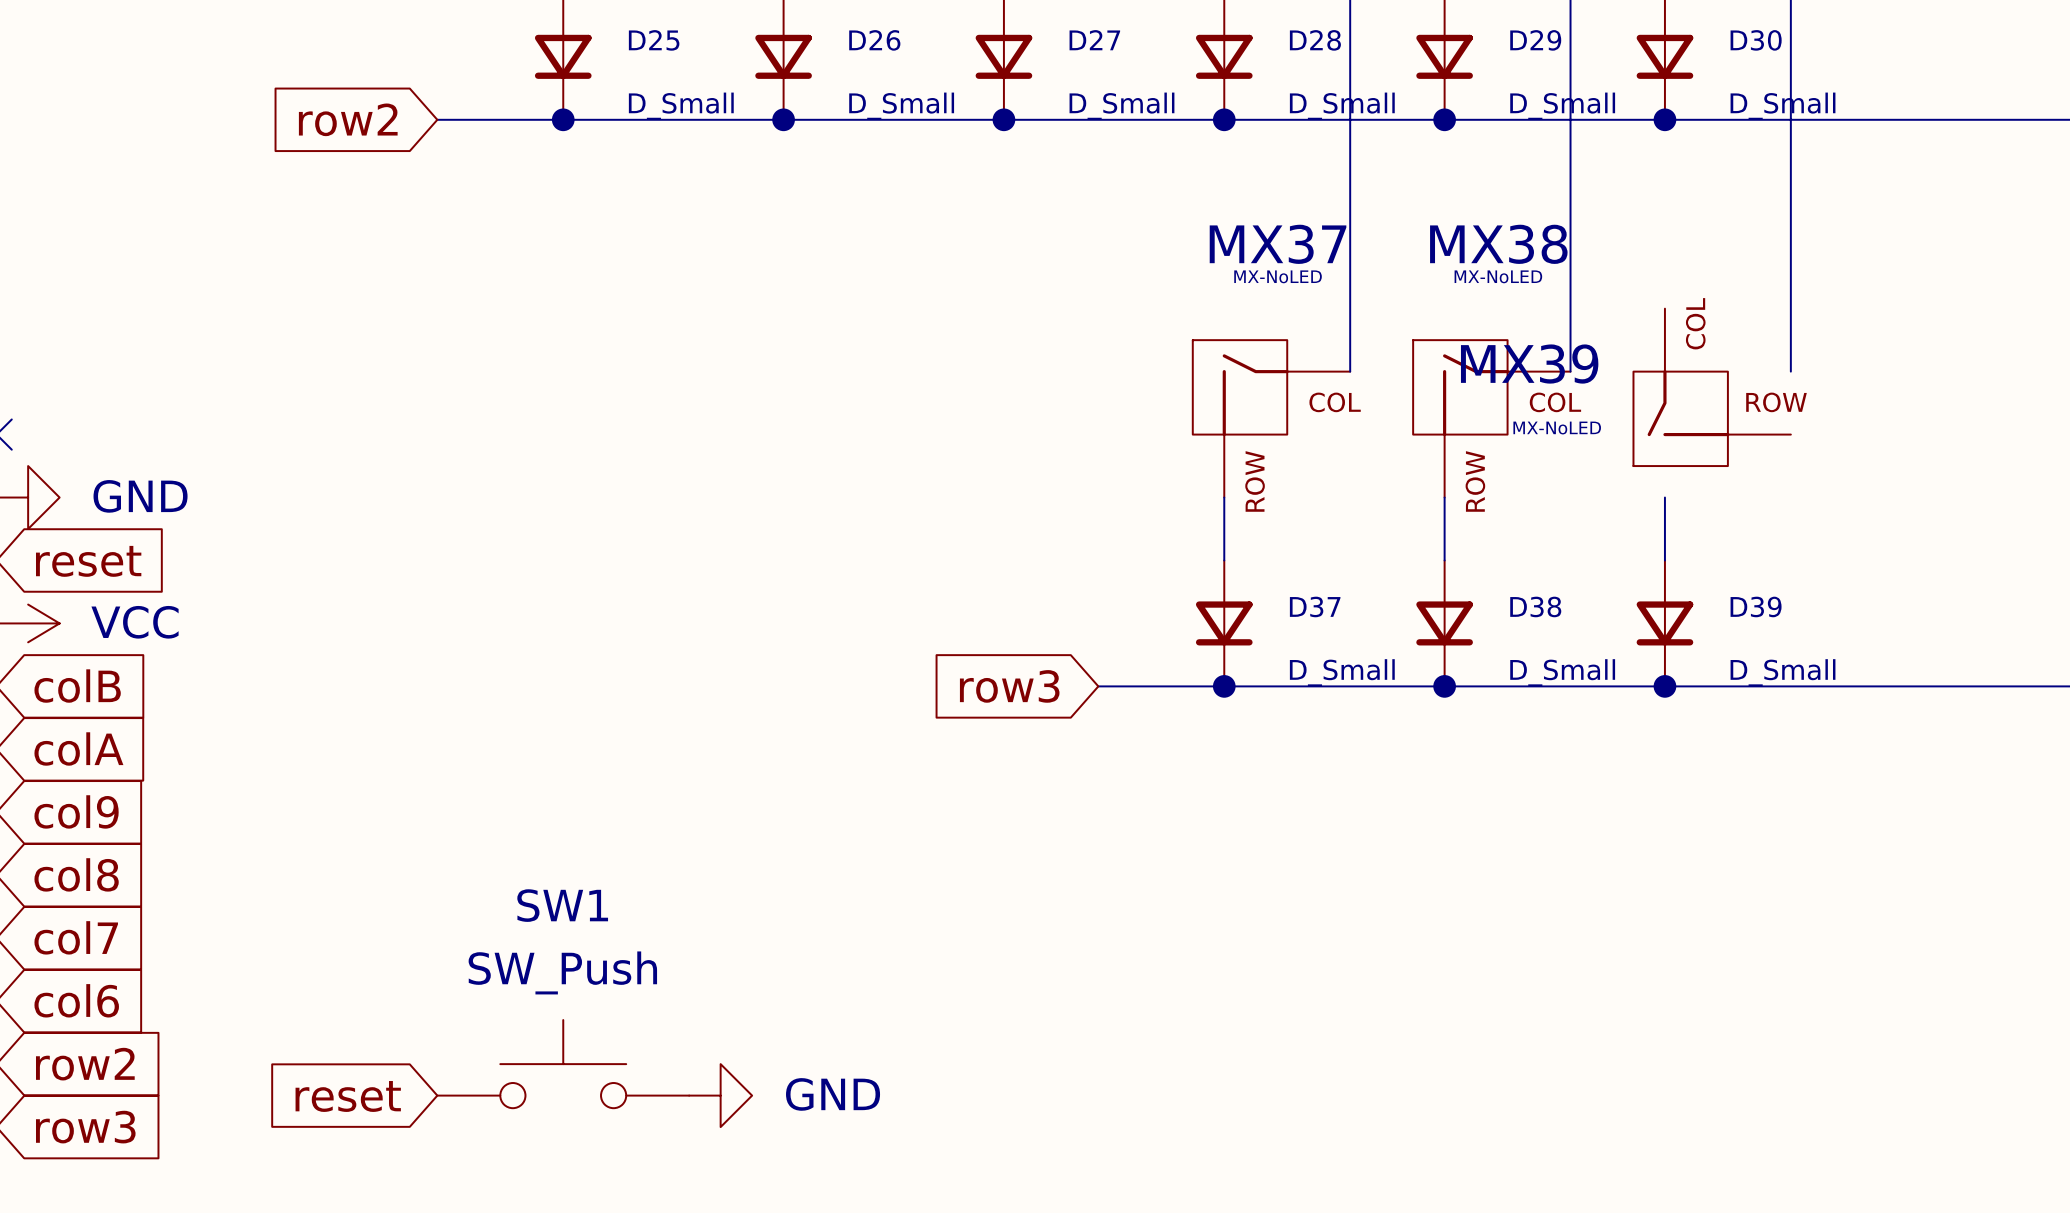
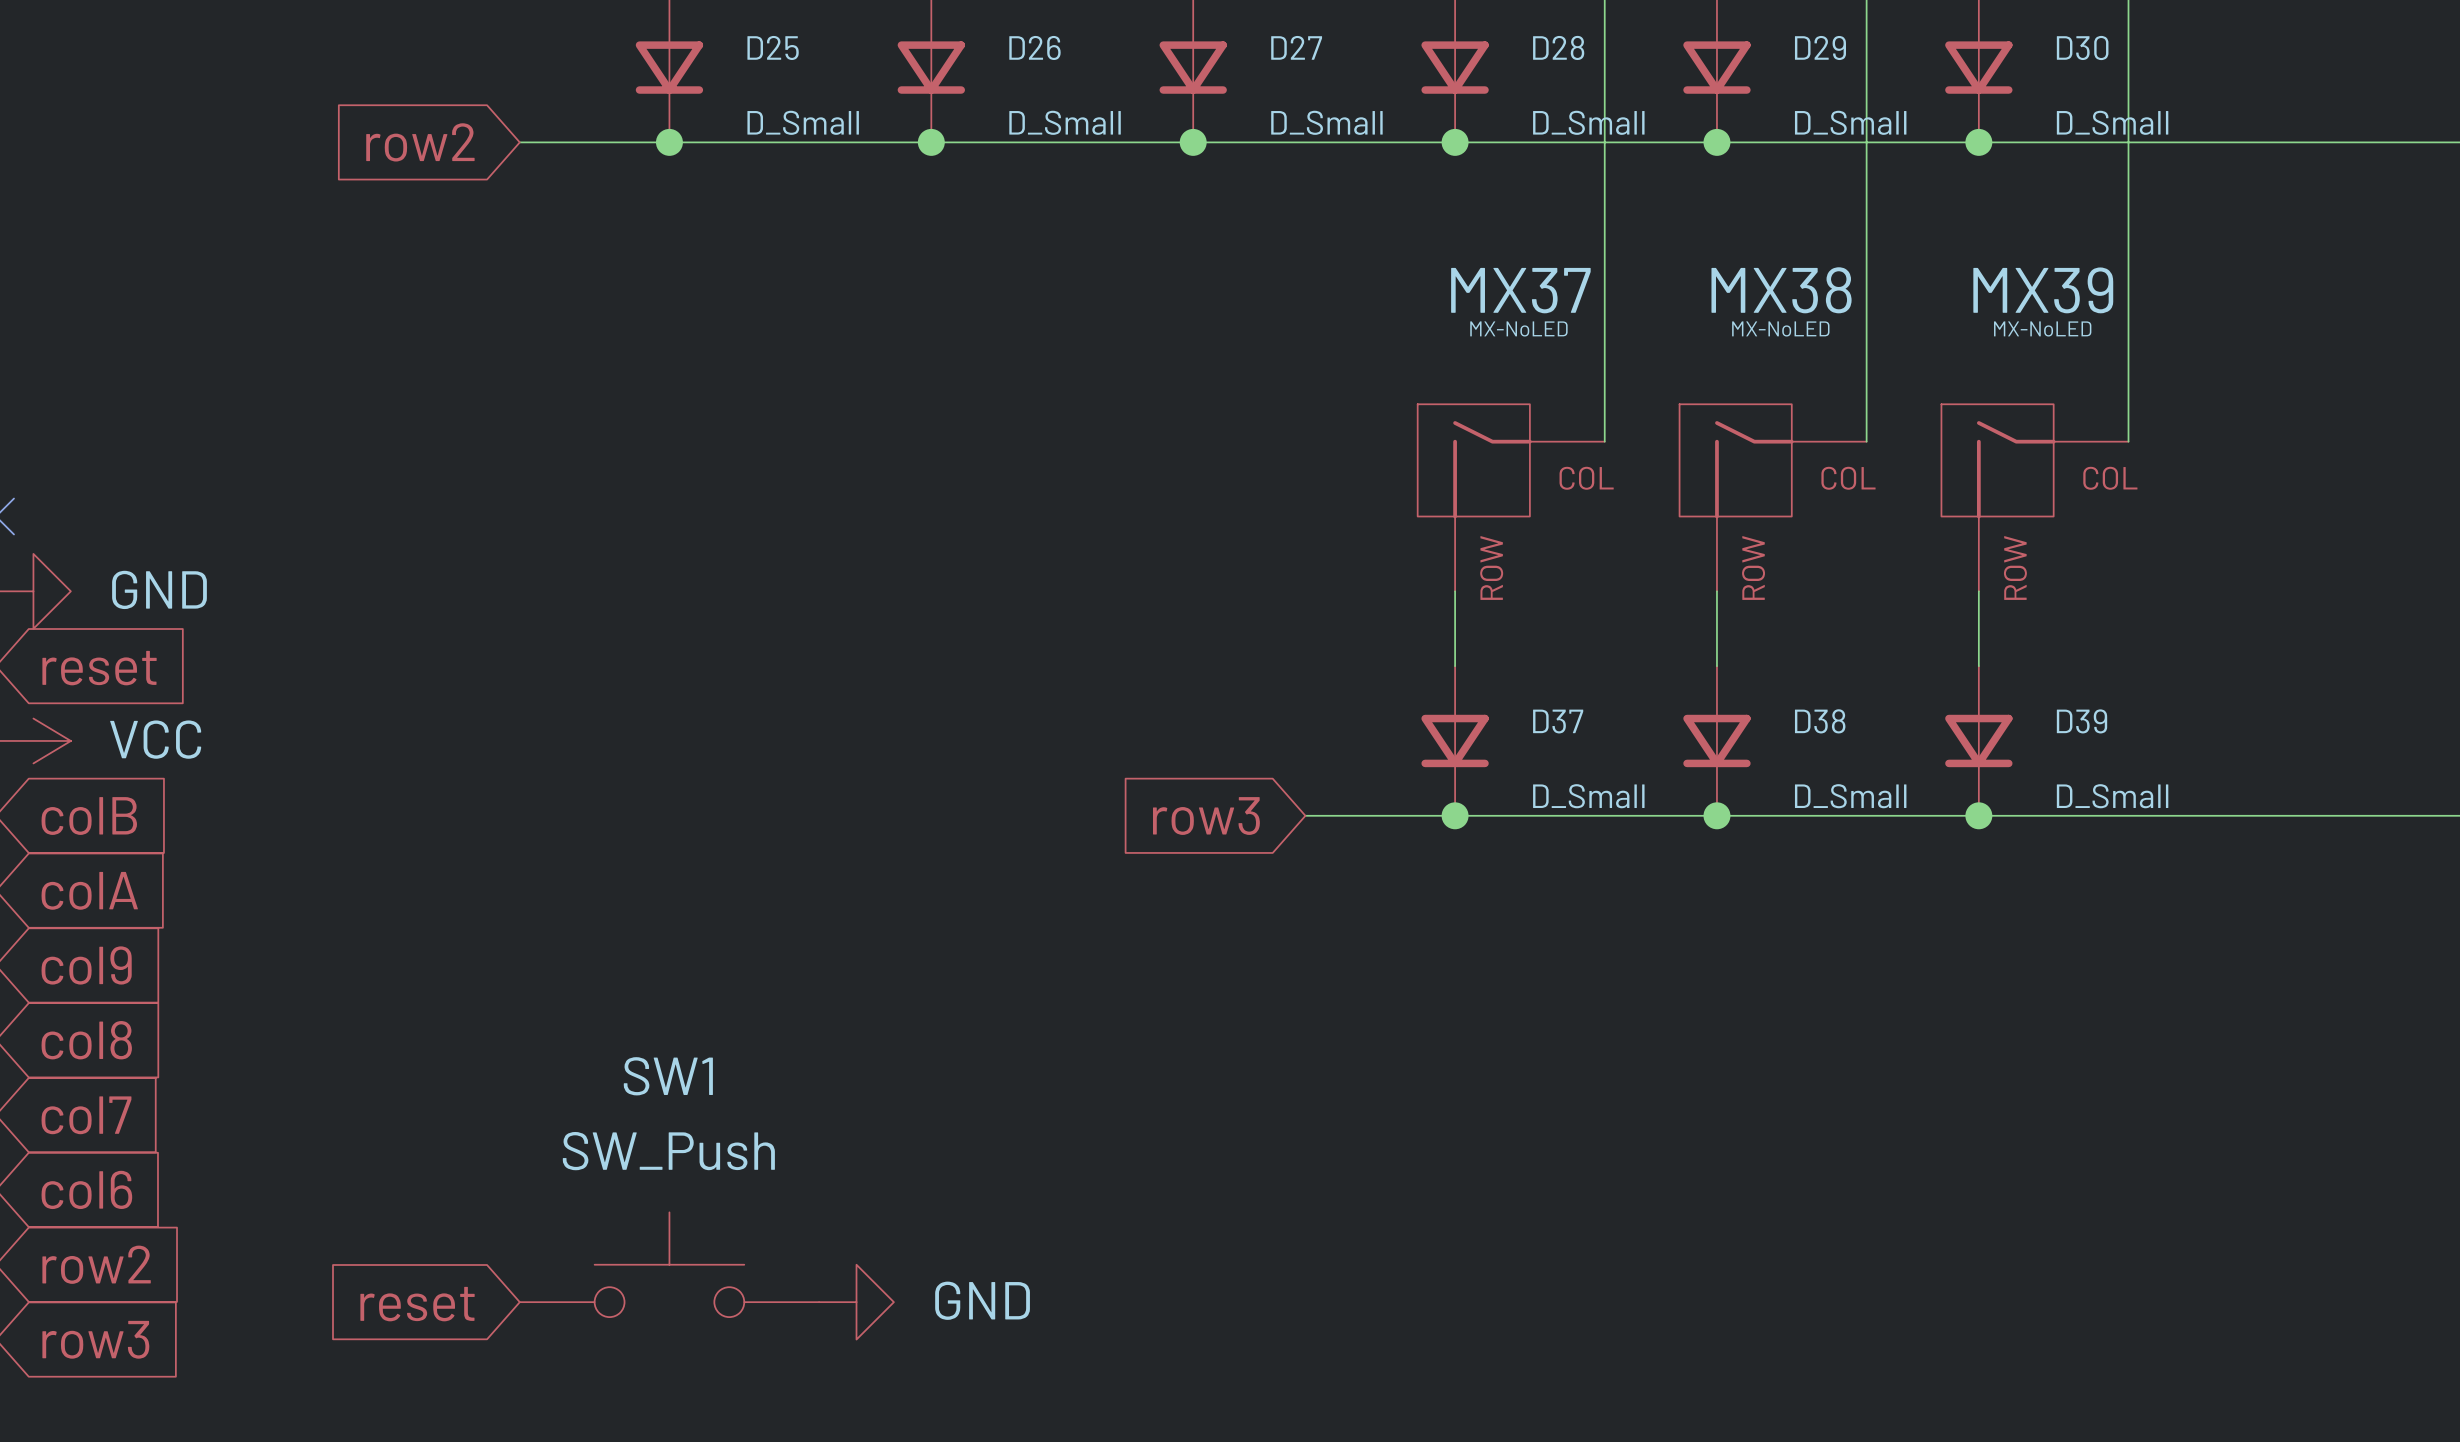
MX39 rotation: 0° (1681, 418) -> 90° clockwise (1998, 461)
MX39 value position: MX-NoLED (1557, 428) -> MX-NoLED (2042, 328)

